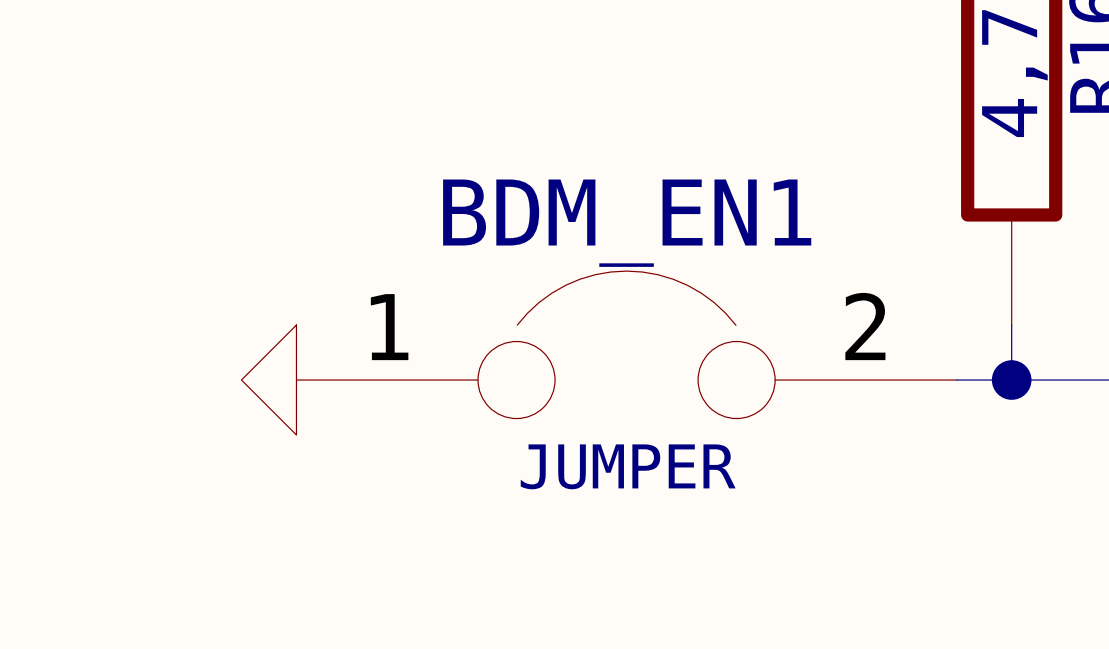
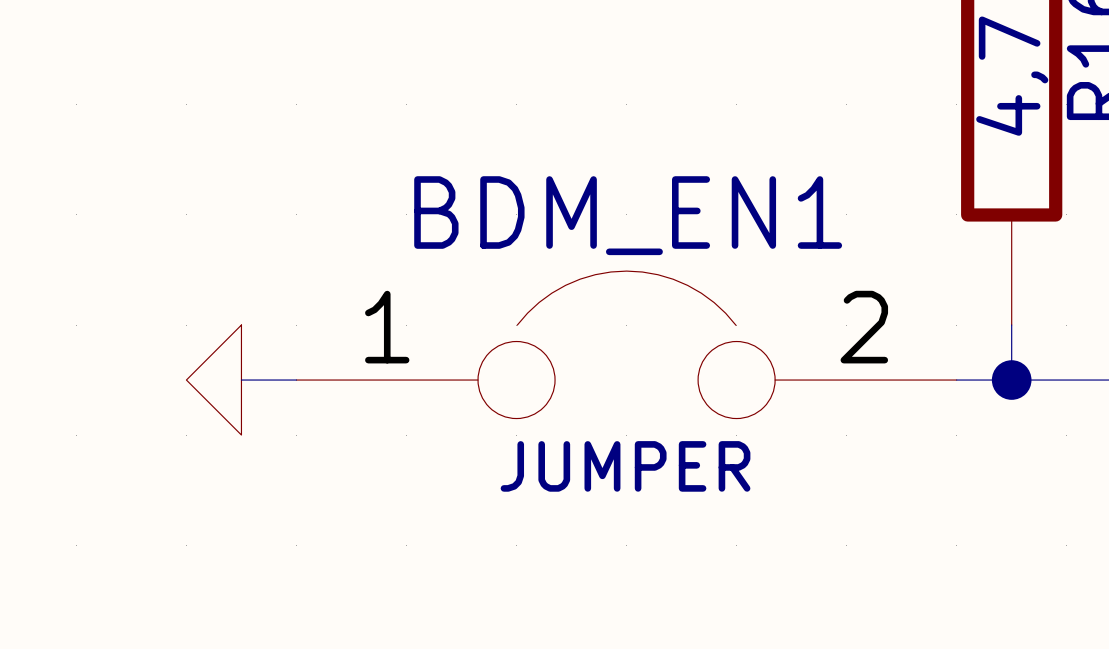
wire: none -> (241, 380) (296, 380)
power symbol position: (268, 380) -> (213, 380)

